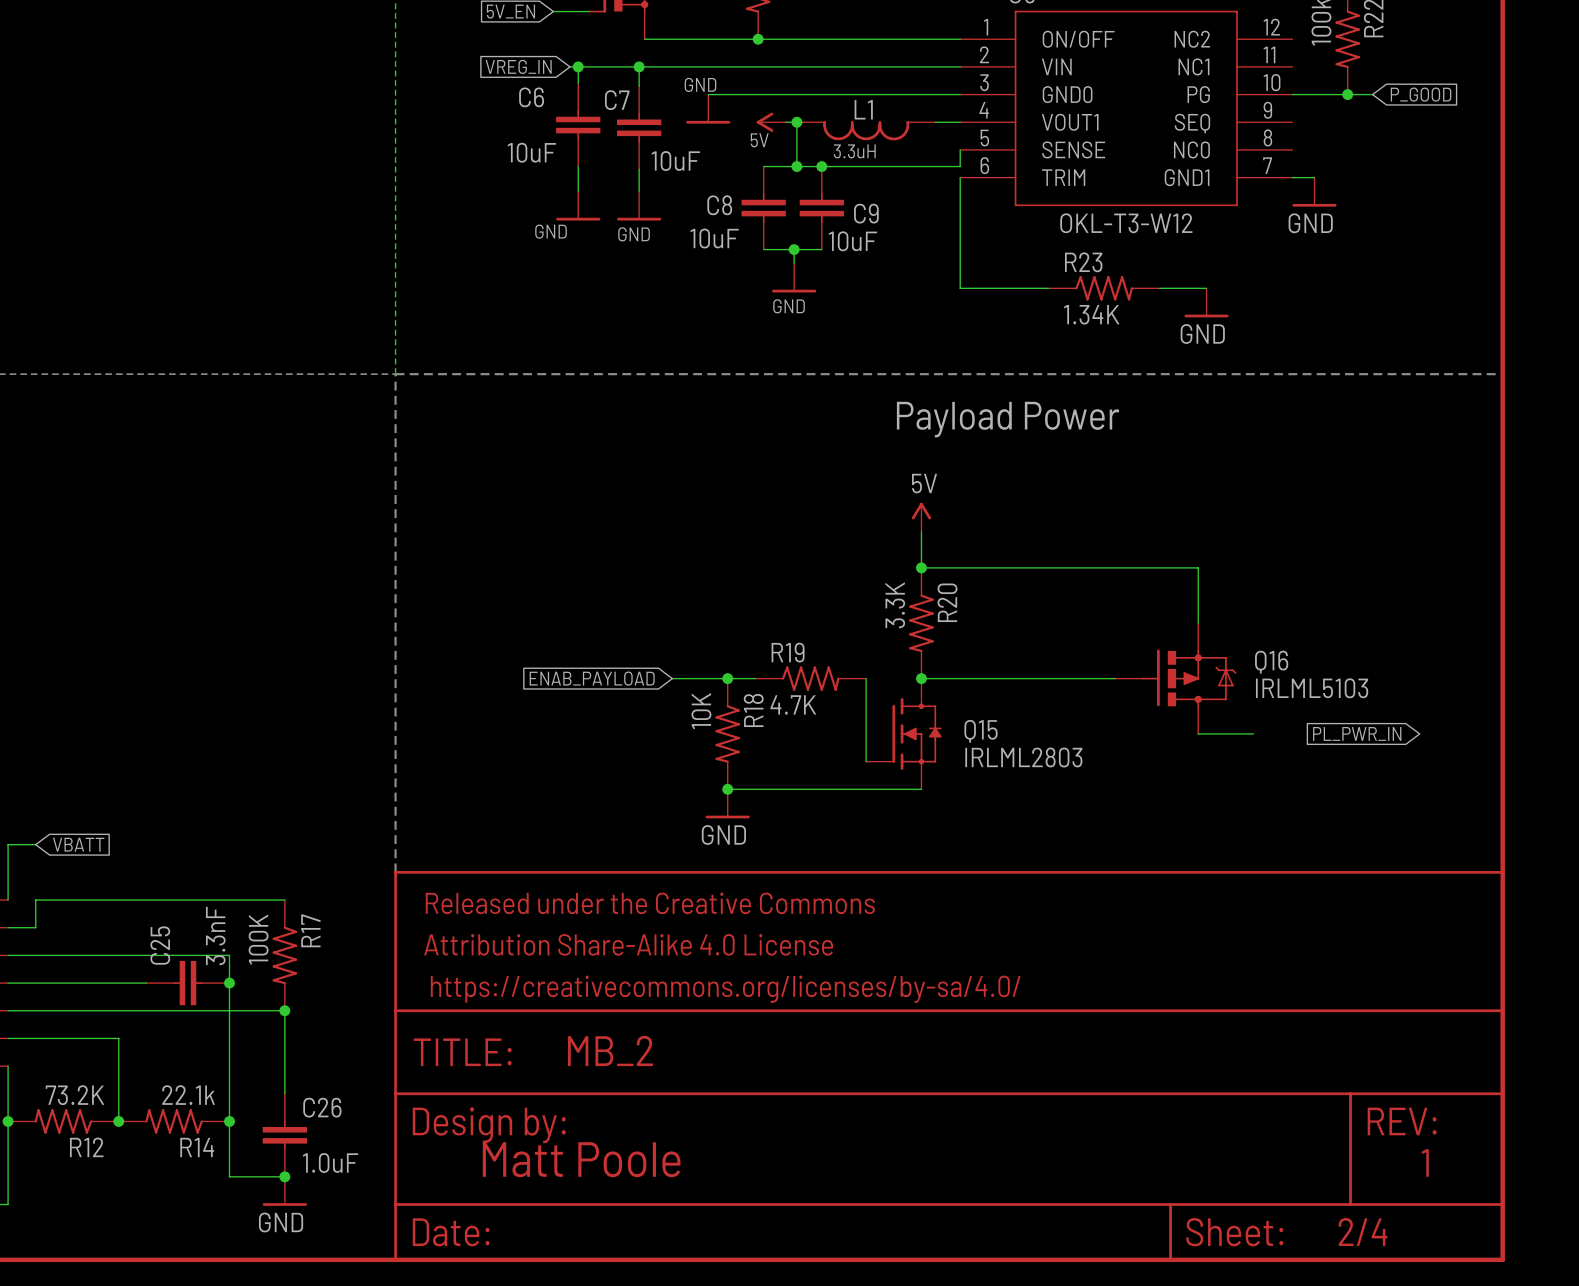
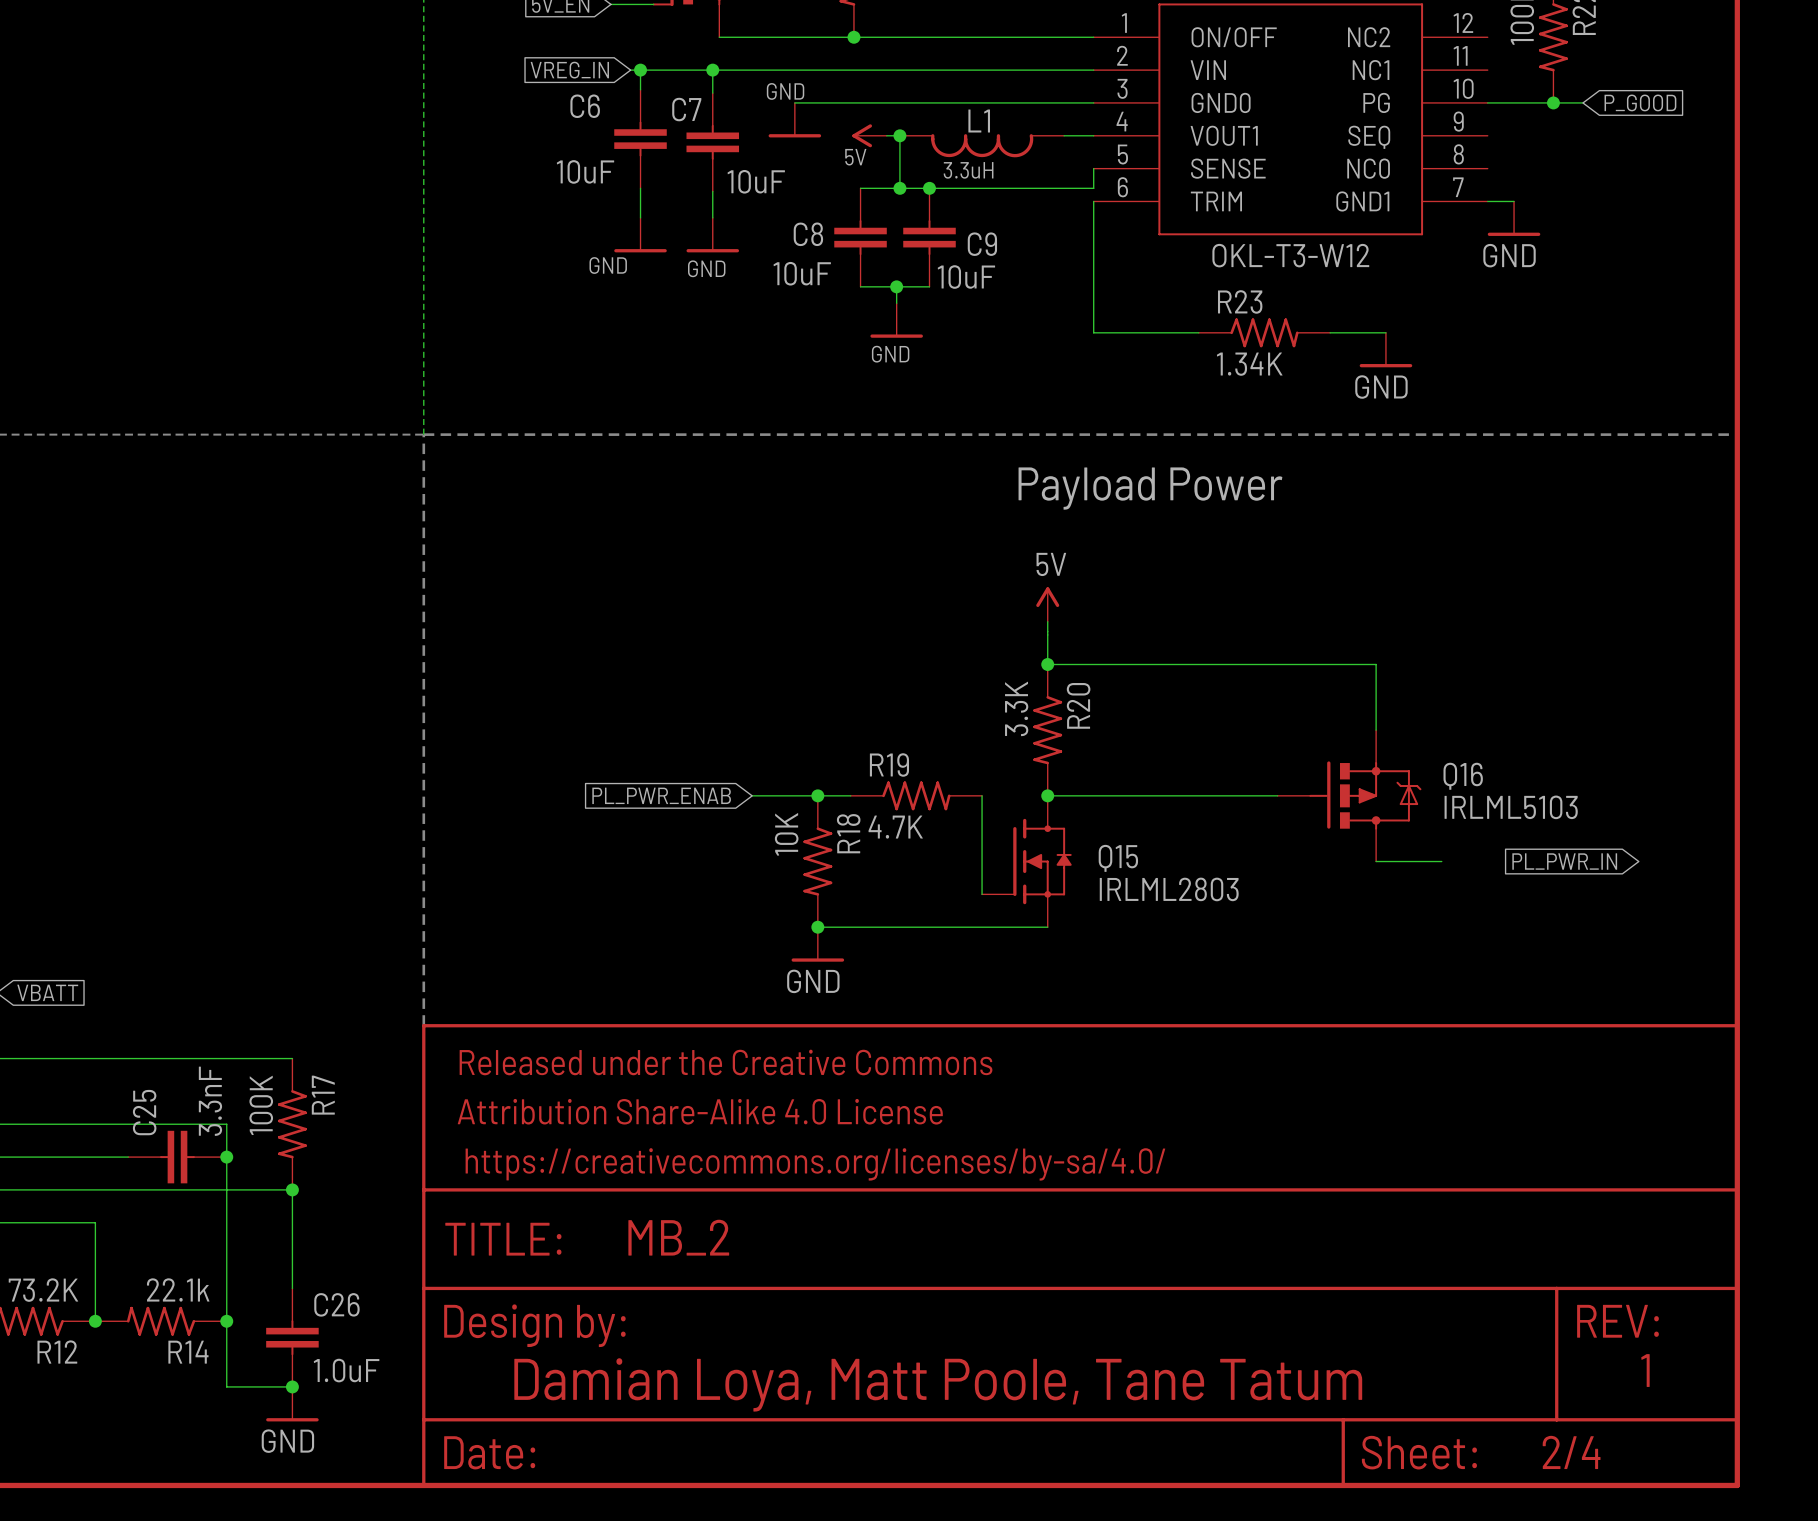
global label: ENAB_PAYLOAD (592, 678) -> PL_PWR_ENAB (661, 795)
text: Matt Poole (581, 1159) -> none
text: none -> Damian Loya, Matt Poole, Tane Tatum (938, 1384)

